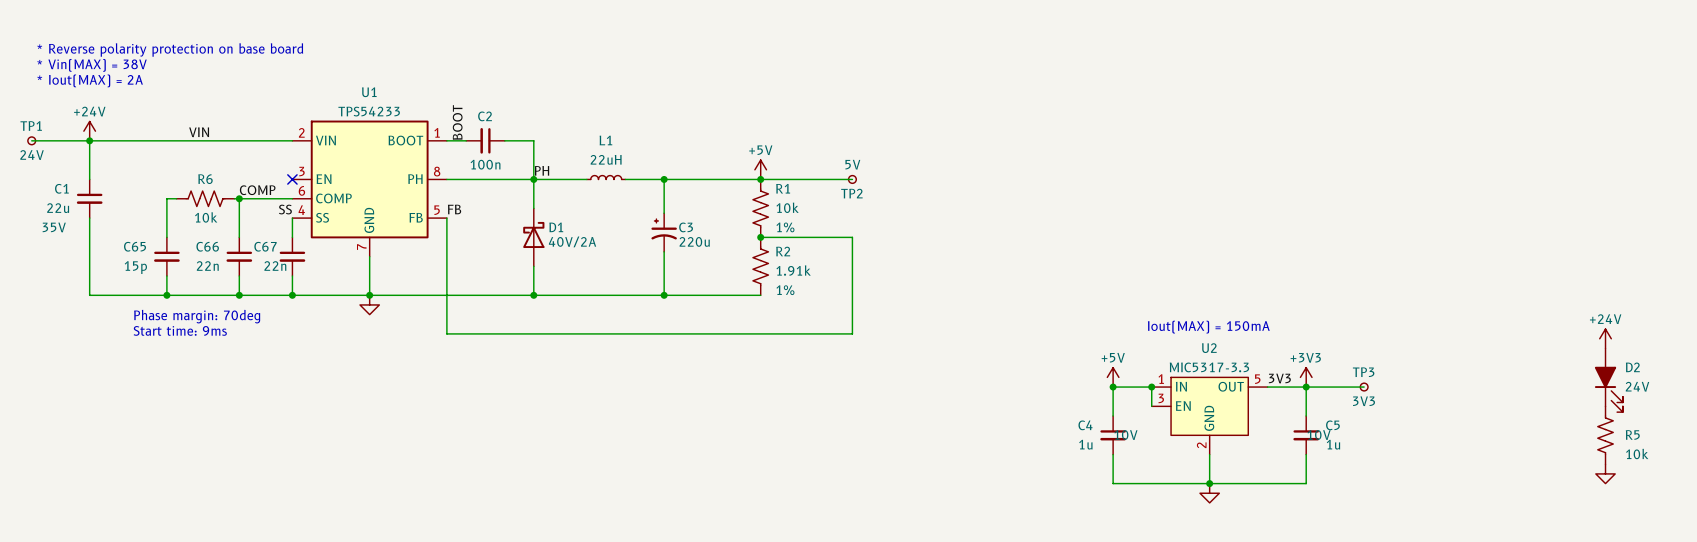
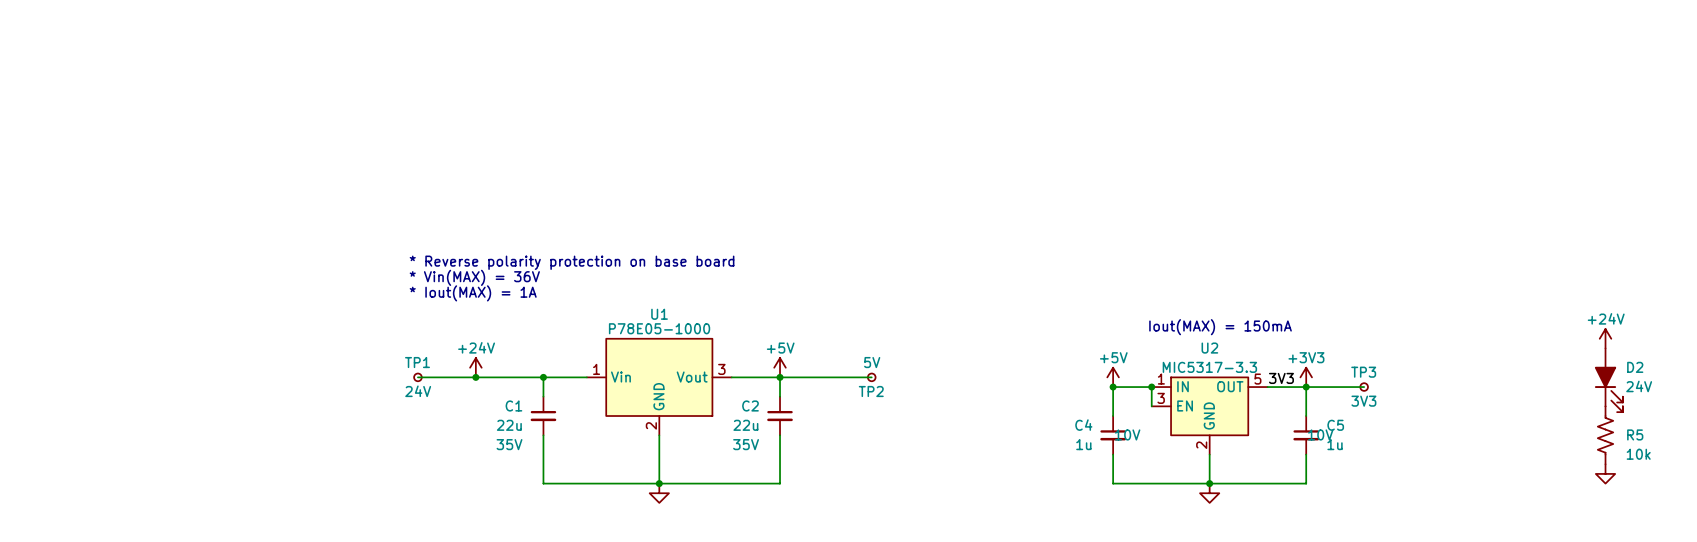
text: * Reverse polarity protection on base board (170, 50) -> none
text: * Vin(MAX) = 38V (92, 65) -> none
text: * Iout(MAX) = 2A (90, 80) -> none
U1 name position: U1 (369, 92) -> U1 (659, 314)
U1 value: TPS54233 (369, 111) -> P78E05-1000 (659, 328)
U1 symbol: [292, 120, 447, 257] -> [586, 338, 732, 436]
label: BOOT (457, 122) -> none
power symbol: +24V (89, 131) -> none
label: VIN (199, 132) -> none
wire: (31, 140) (292, 140) -> none
TP1 position: (31, 140) -> (417, 377)
wire: (89, 140) (89, 179) -> none
junction: (89, 140) -> none
wire: (446, 140) (466, 140) -> none
C2 rotation: 0° (485, 140) -> 90° counterclockwise (780, 416)
C2 position: (485, 140) -> (780, 416)
wire: (504, 140) (533, 140) (533, 208) -> none
C2 value: 100n (485, 164) -> 22u (745, 425)
power symbol: +5V (760, 169) -> none
label: PH (541, 170) -> none
L1: 22uH (606, 177) -> none
no-connect mark: (292, 179) -> none
wire: (446, 179) (586, 179) -> none
junction: (533, 179) -> none
wire: (625, 179) (852, 179) -> none
wire: (664, 179) (664, 213) -> none
junction: (664, 179) -> none
junction: (760, 179) -> none
TP2 position: (852, 179) -> (871, 377)
label: COMP (257, 190) -> none
C1 position: (89, 198) -> (543, 416)
wire: (176, 198) (166, 198) (166, 237) -> none
R6: 10k (205, 198) -> none
wire: (234, 198) (292, 198) -> none
wire: (239, 198) (239, 237) -> none
junction: (239, 198) -> none
R1: 10k (760, 208) -> none
label: SS (285, 209) -> none
label: FB (454, 209) -> none
wire: (89, 218) (89, 295) (760, 295) -> none
wire: (292, 218) (292, 237) -> none
wire: (446, 218) (446, 333) (852, 333) (852, 237) (760, 237) -> none
C3: 220u (664, 232) -> none
D1: 40V/2A (533, 237) -> none
junction: (760, 237) -> none
wire: (664, 251) (664, 295) -> none
C65: 15p (166, 256) -> none
C66: 22n (239, 256) -> none
C67: 22n (292, 256) -> none
wire: (369, 256) (369, 295) -> none
text: none -> * Reverse polarity protection on base board (572, 262)
wire: (533, 266) (533, 295) -> none
R2: 1.91k (760, 266) -> none
wire: (166, 276) (166, 295) -> none
wire: (239, 276) (239, 295) -> none
wire: (292, 276) (292, 295) -> none
text: none -> * Vin(MAX) = 36V (474, 277)
text: none -> * Iout(MAX) = 1A (473, 293)
junction: (166, 295) -> none
junction: (239, 295) -> none
junction: (292, 295) -> none
junction: (369, 295) -> none
junction: (533, 295) -> none
junction: (664, 295) -> none
power symbol: (369, 304) -> none
text: Phase margin: 70deg (197, 316) -> none
text: Start time: 9ms (180, 330) -> none
power symbol: none -> +24V (475, 367)
power symbol: none -> +5V (780, 367)
wire: none -> (417, 377) (586, 377)
junction: none -> (475, 377)
wire: none -> (543, 377) (543, 396)
junction: none -> (543, 377)
wire: none -> (731, 377) (871, 377)
wire: none -> (780, 377) (780, 396)
junction: none -> (780, 377)
wire: none -> (543, 435) (543, 483) (780, 483) (780, 435)
wire: none -> (659, 435) (659, 483)
C2 text: none -> 35V (746, 444)
junction: none -> (659, 483)
power symbol: none -> (659, 493)

